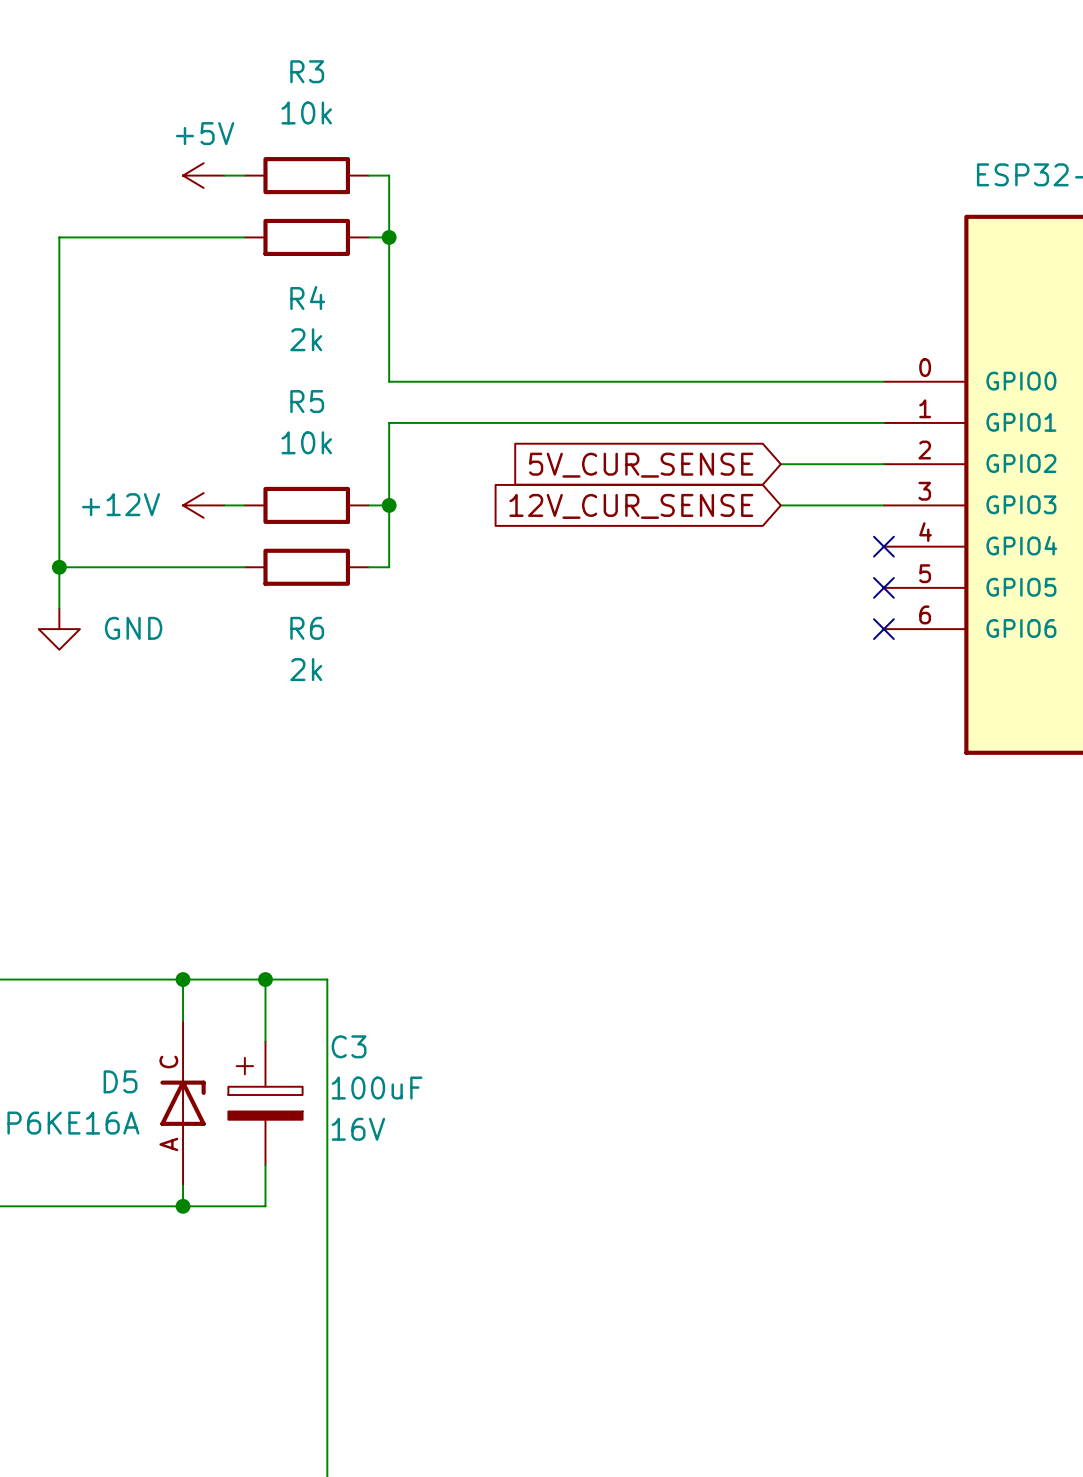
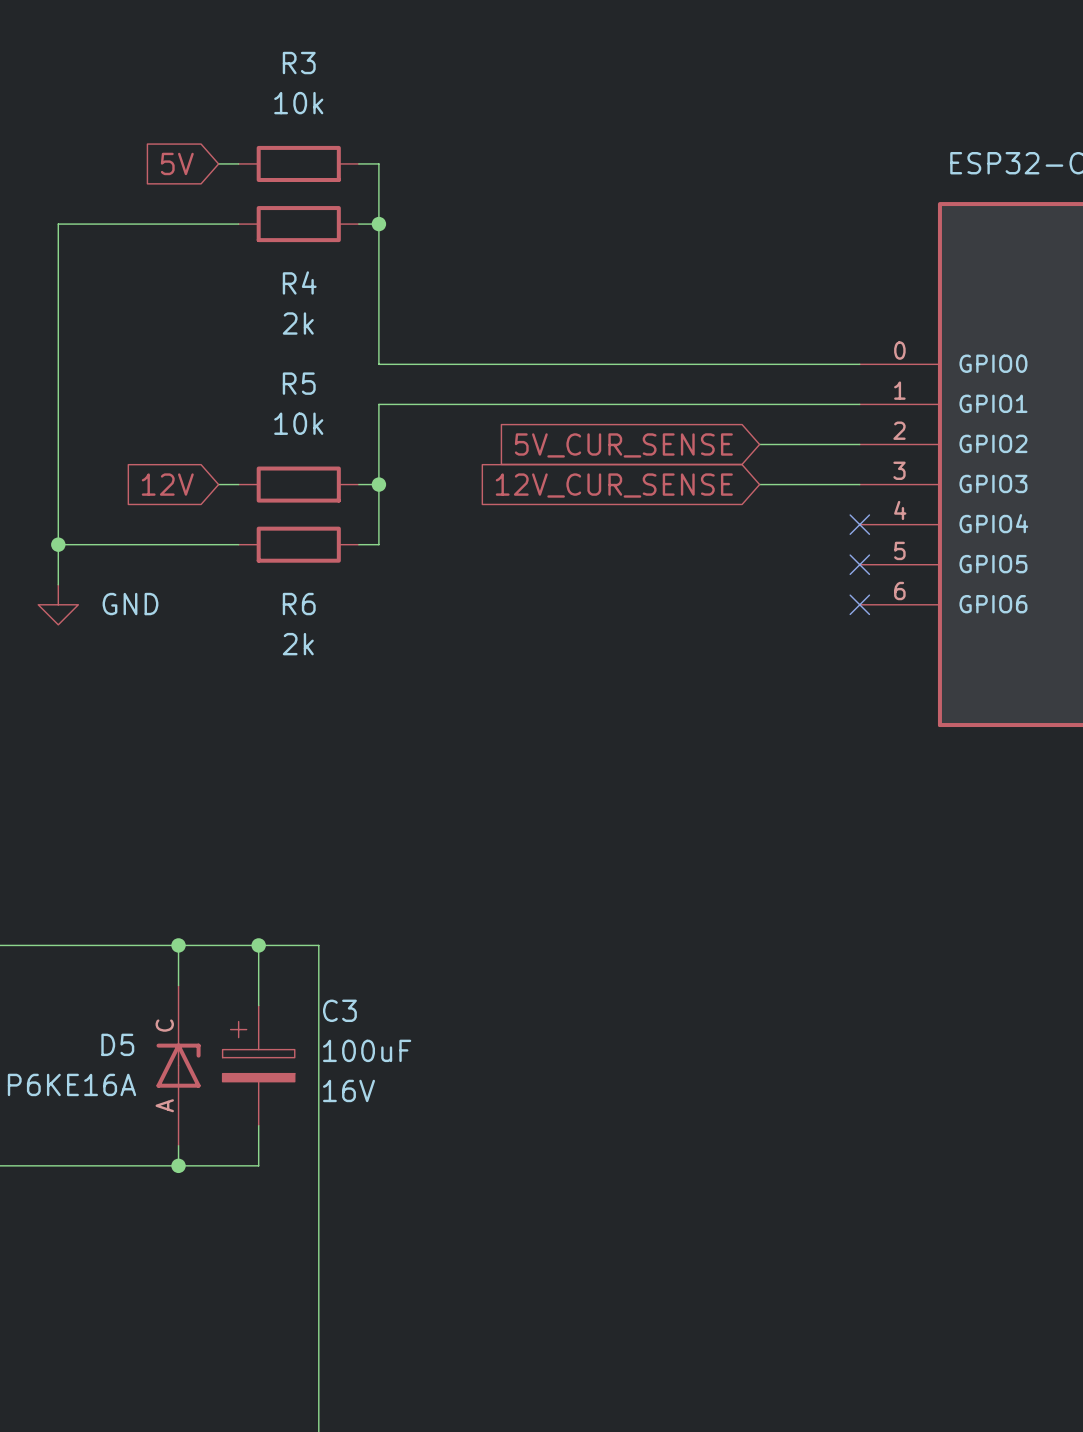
global label: none -> 5V (177, 163)
power symbol: +5V (203, 175) -> none
global label: none -> 12V (167, 484)
power symbol: +12V (203, 505) -> none

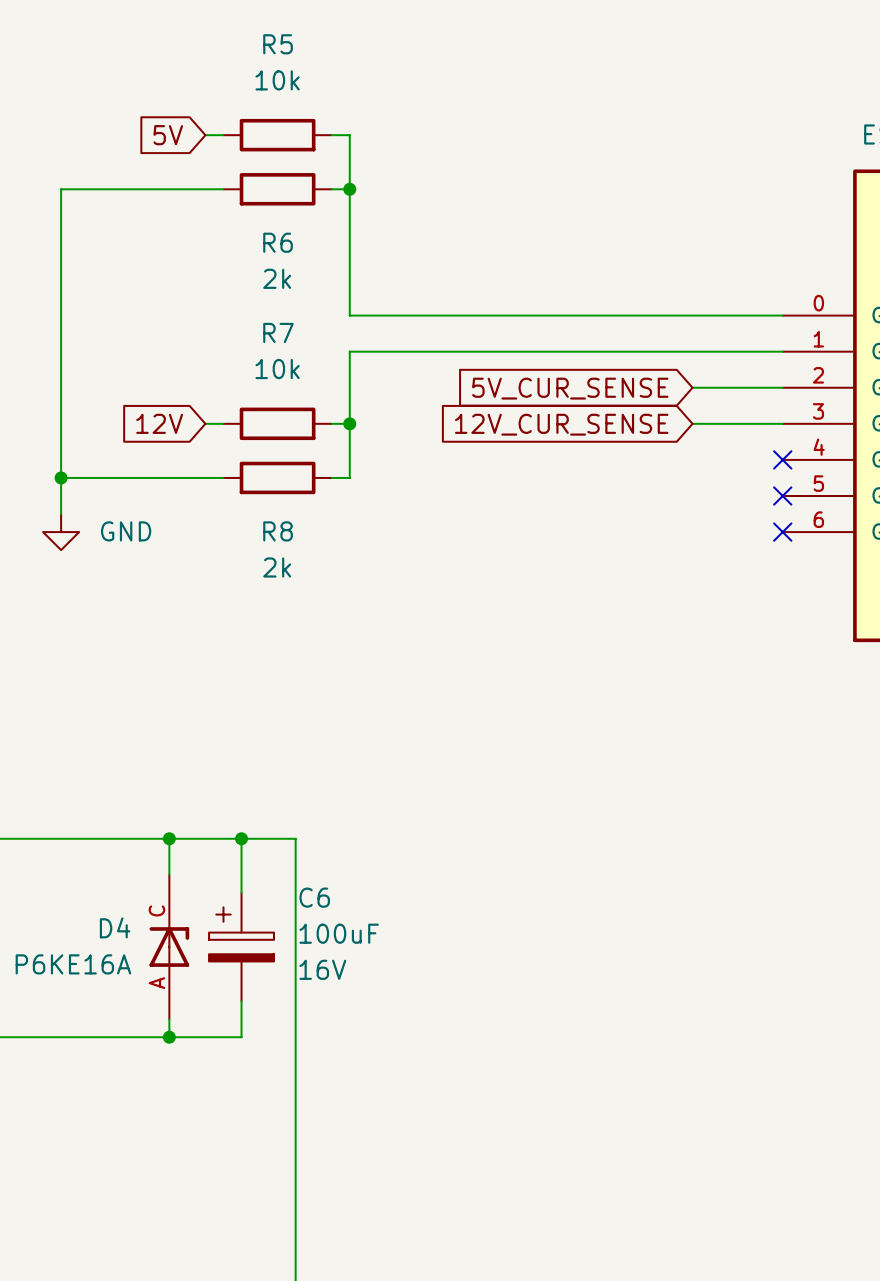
R3 name: R3 (299, 63) -> R5 (278, 44)
R4 name: R4 (299, 282) -> R6 (278, 242)
R5 name: R5 (299, 383) -> R7 (278, 332)
R6 name: R6 (299, 604) -> R8 (278, 531)
C3 name: C3 (339, 1010) -> C6 (314, 897)
D5 name: D5 (117, 1044) -> D4 (115, 927)

